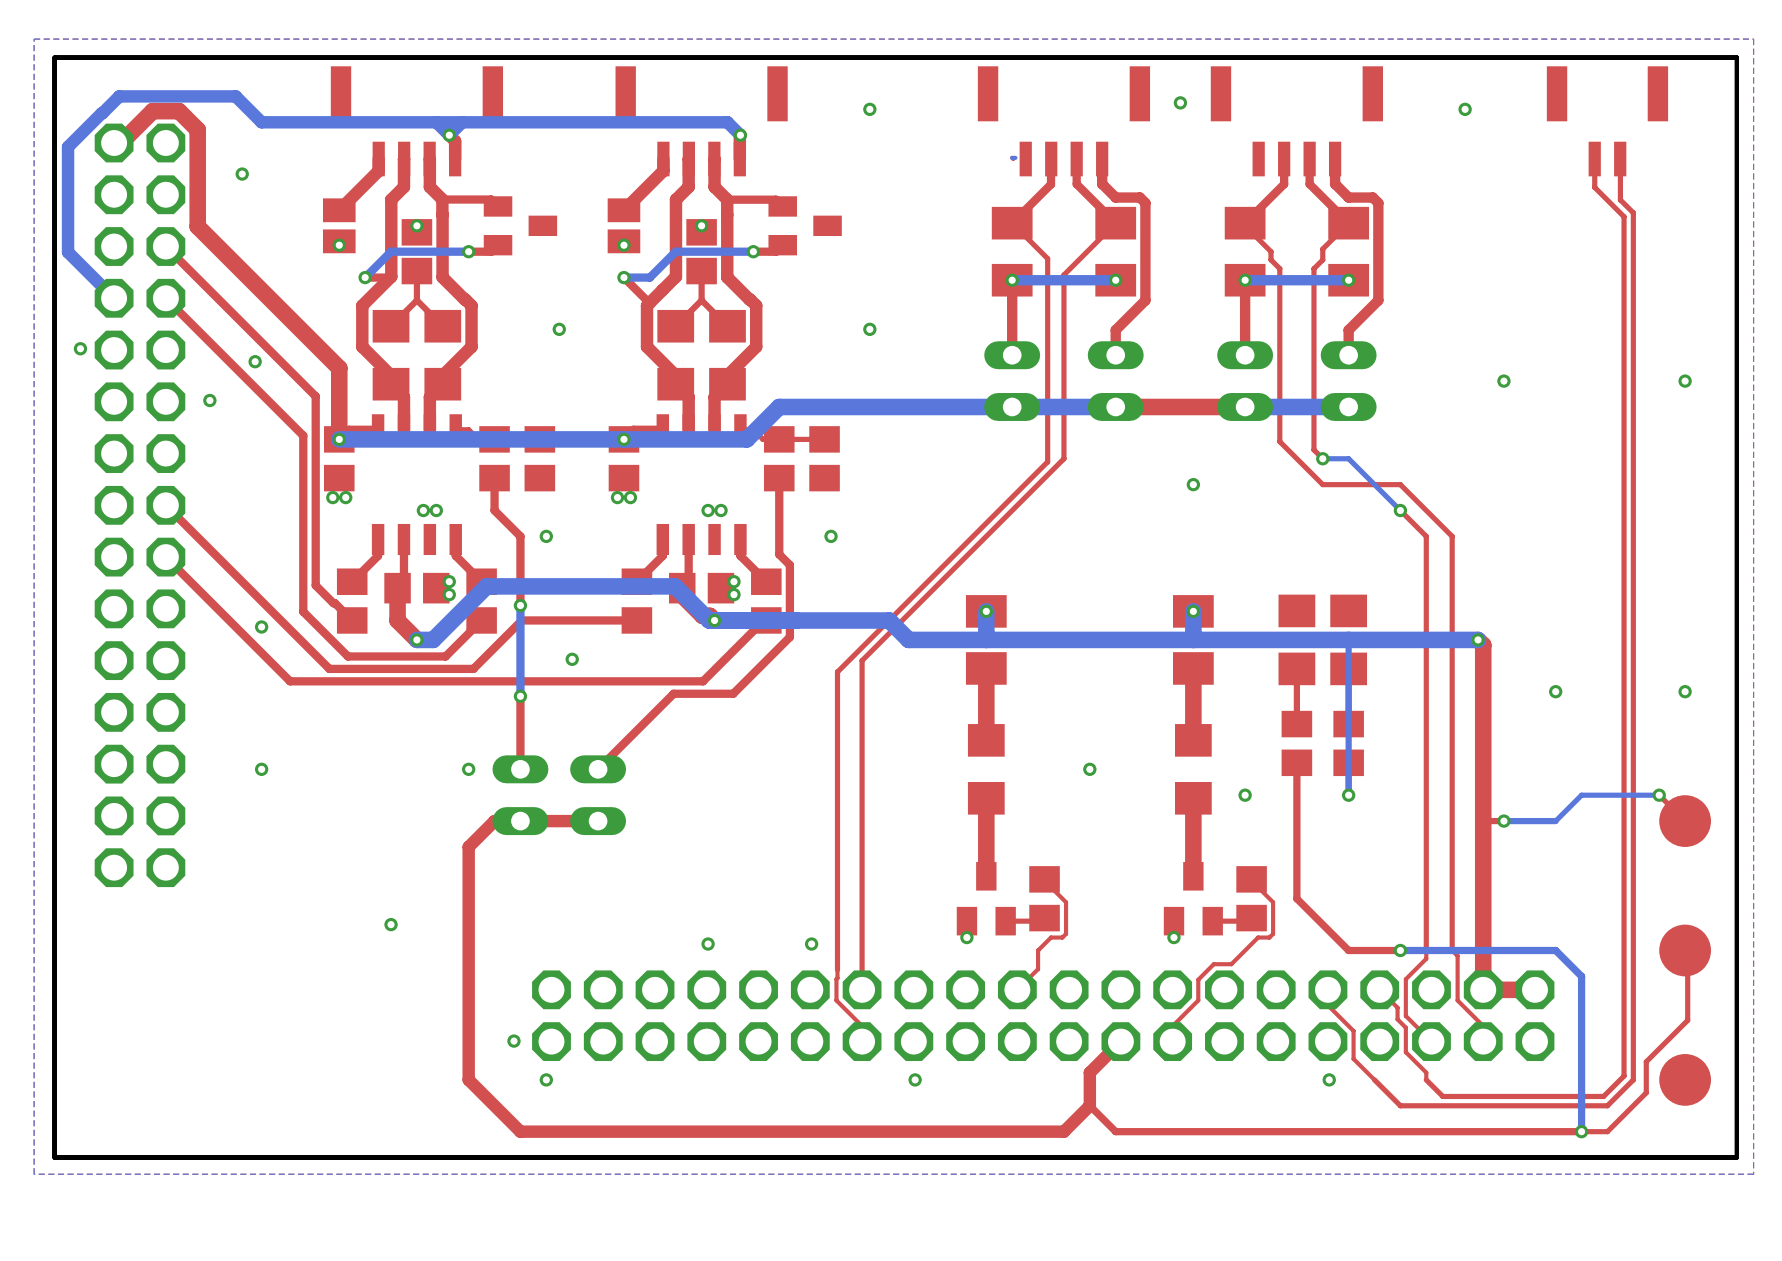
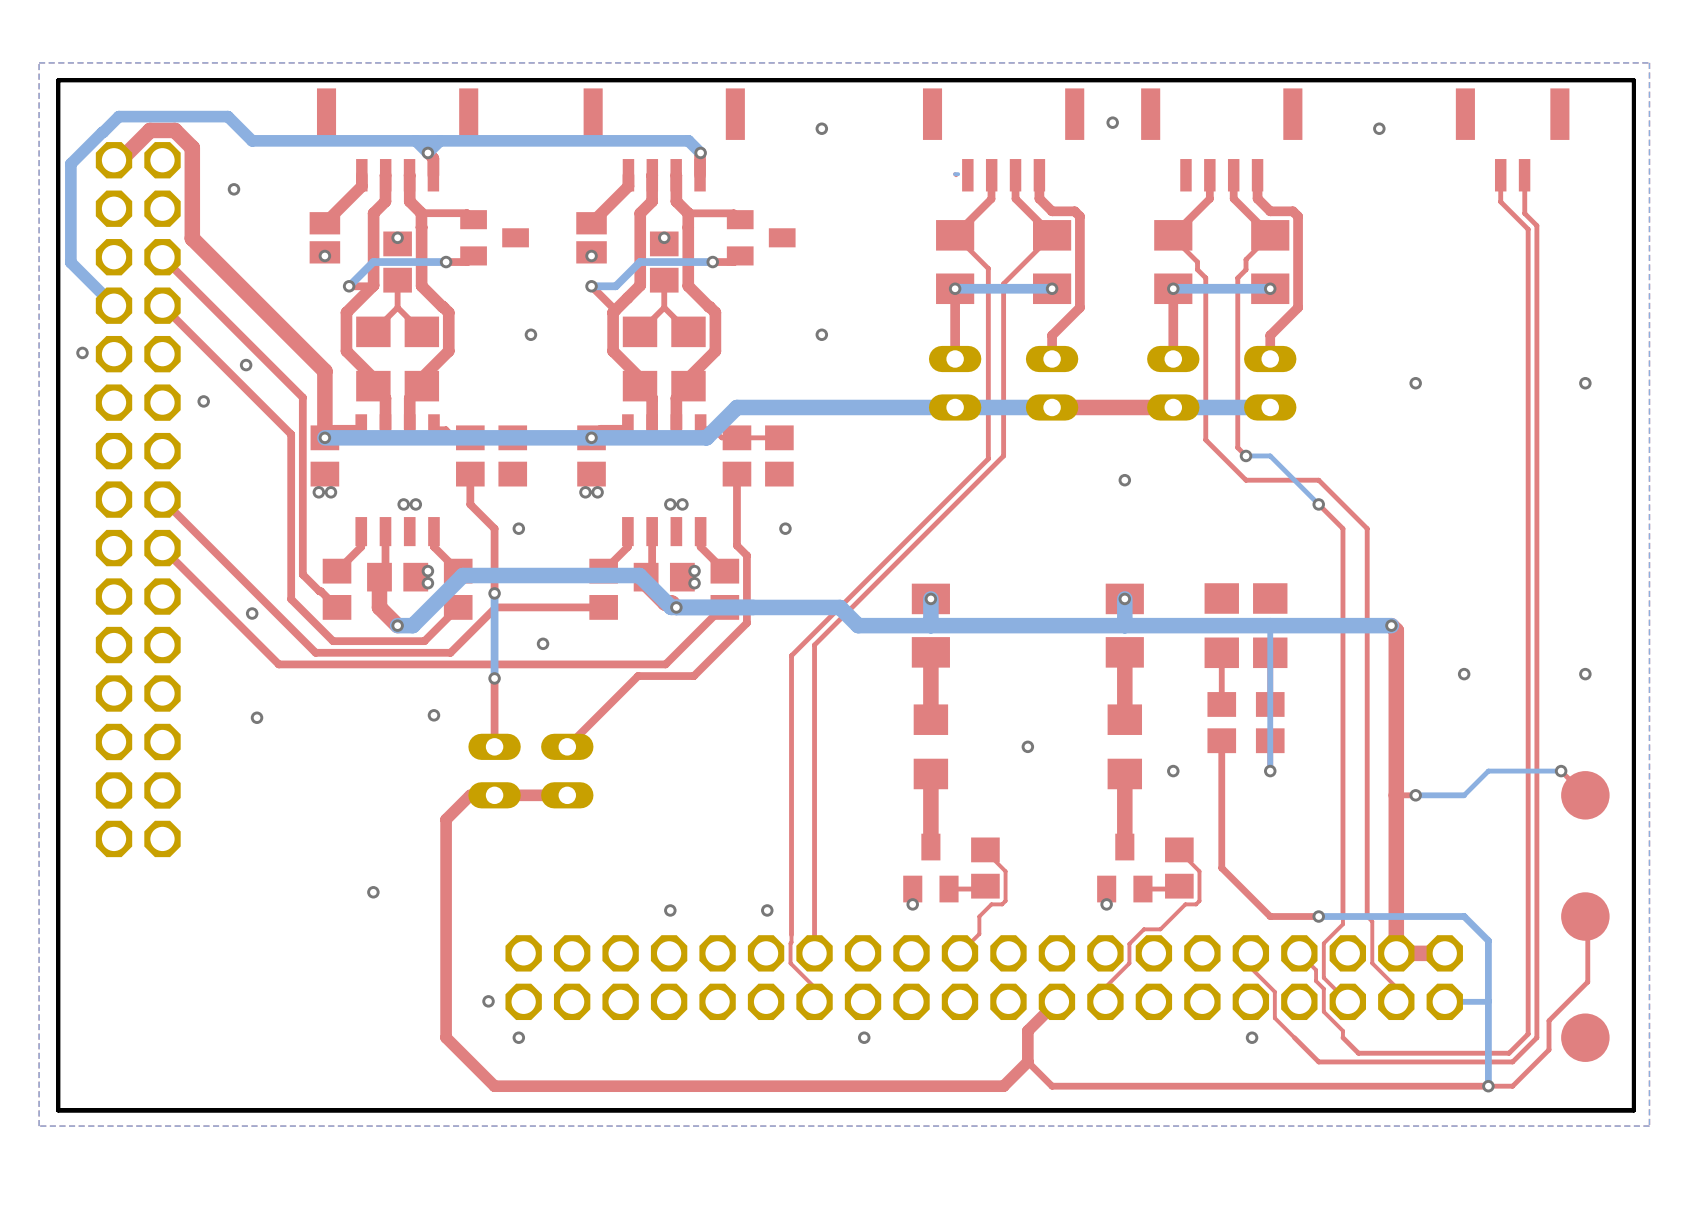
via position: (261, 769) -> (257, 717)
via position: (468, 769) -> (433, 715)
bottom track: none -> (1488, 1001) (1444, 1001)

